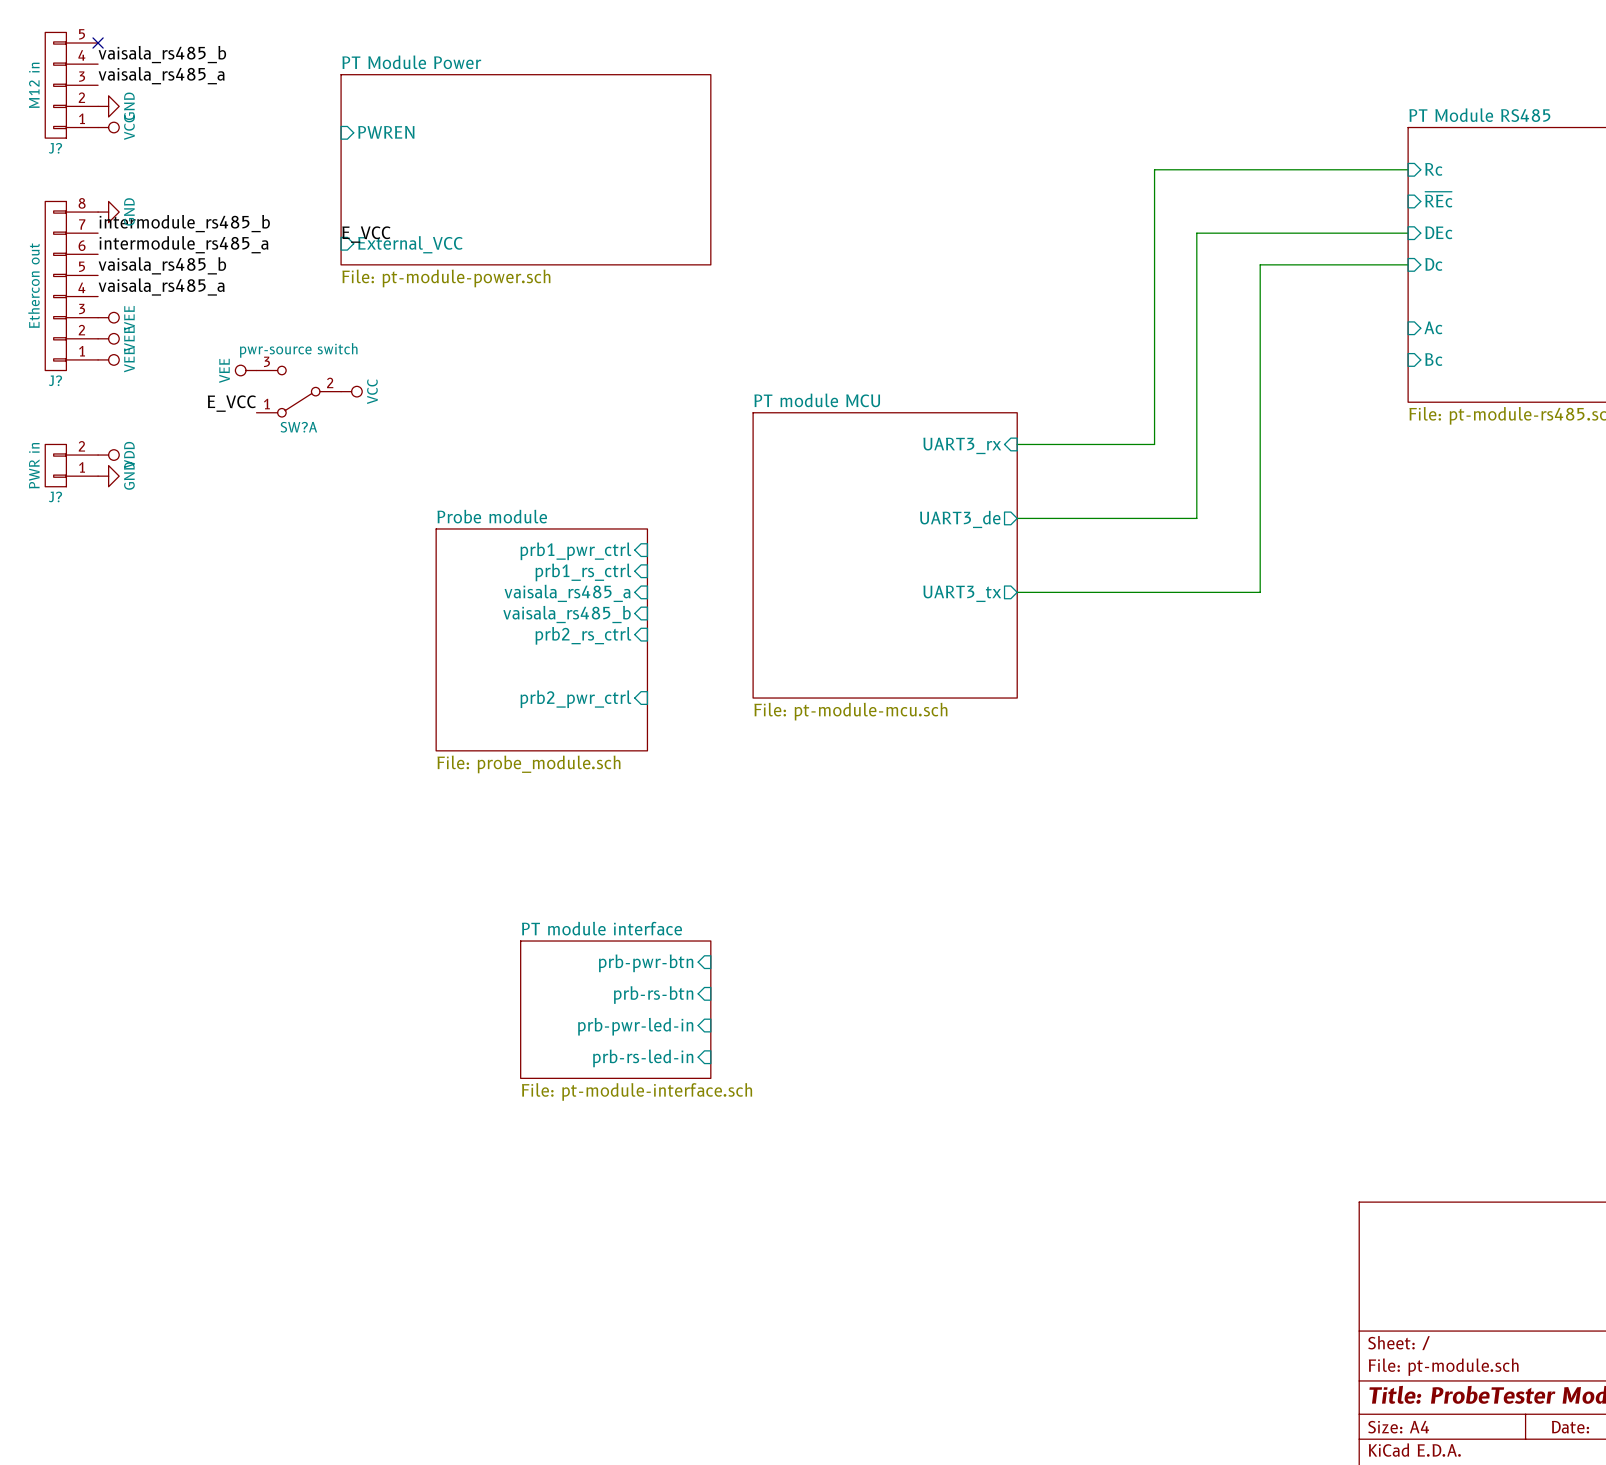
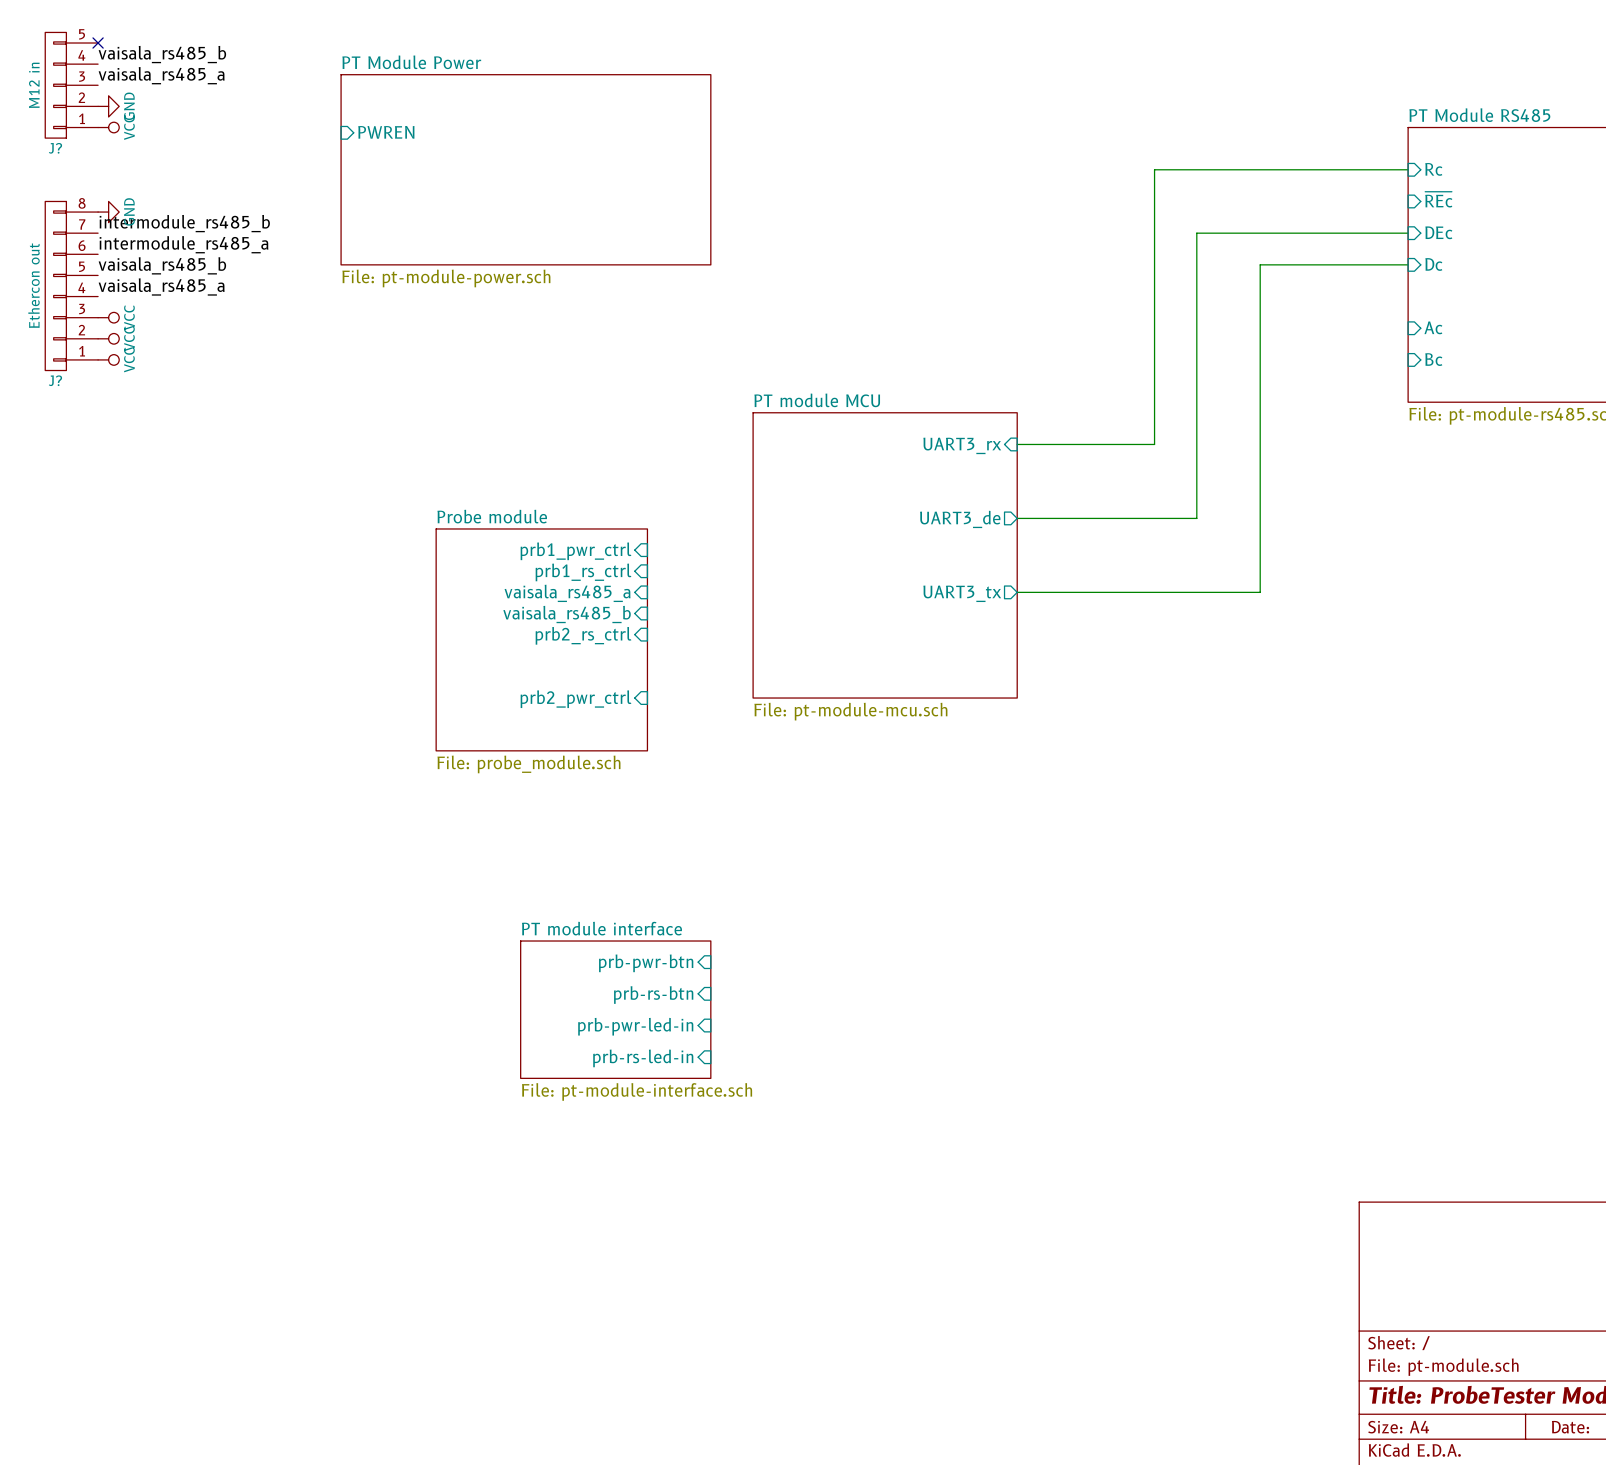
label: E_VCC (366, 234) -> none
sheet pin: External_VCC (410, 244) -> none
power symbol: VEE (108, 317) -> VCC (108, 317)
power symbol: VEE (108, 338) -> VCC (108, 338)
power symbol: VEE (108, 359) -> VCC (108, 359)
power symbol: VEE (245, 370) -> none
SW?A: pwr-source switch (298, 391) -> none
power symbol: VCC (351, 391) -> none
label: E_VCC (231, 403) -> none
power symbol: VDD (108, 455) -> none
J?: PWR in (71, 465) -> none
power symbol: GND (108, 476) -> none

